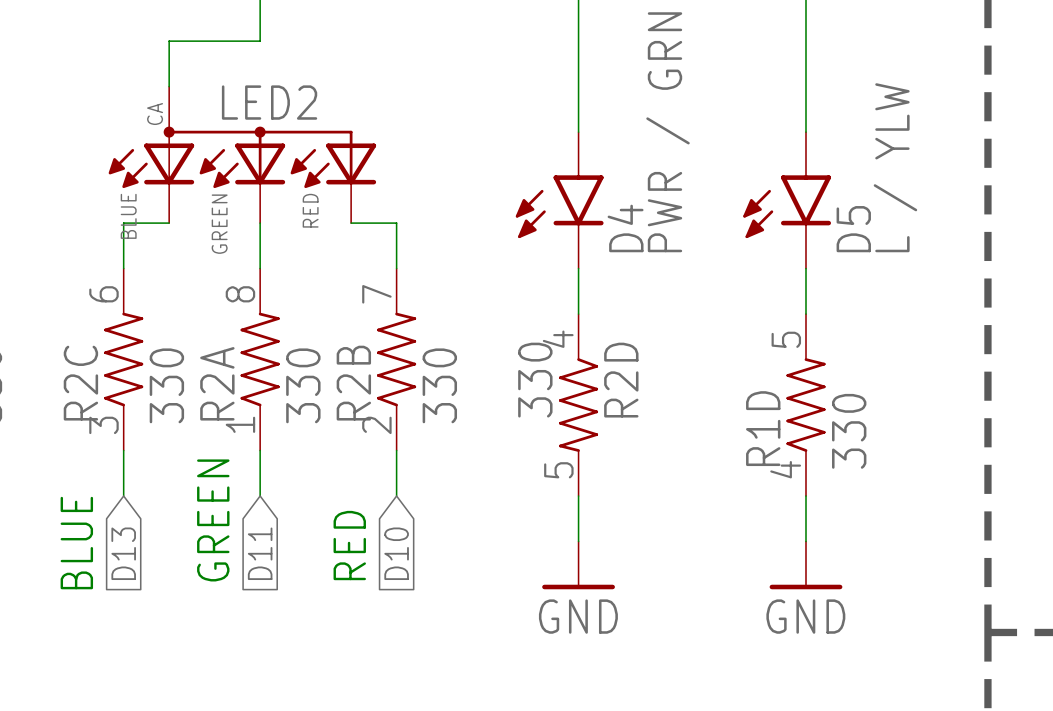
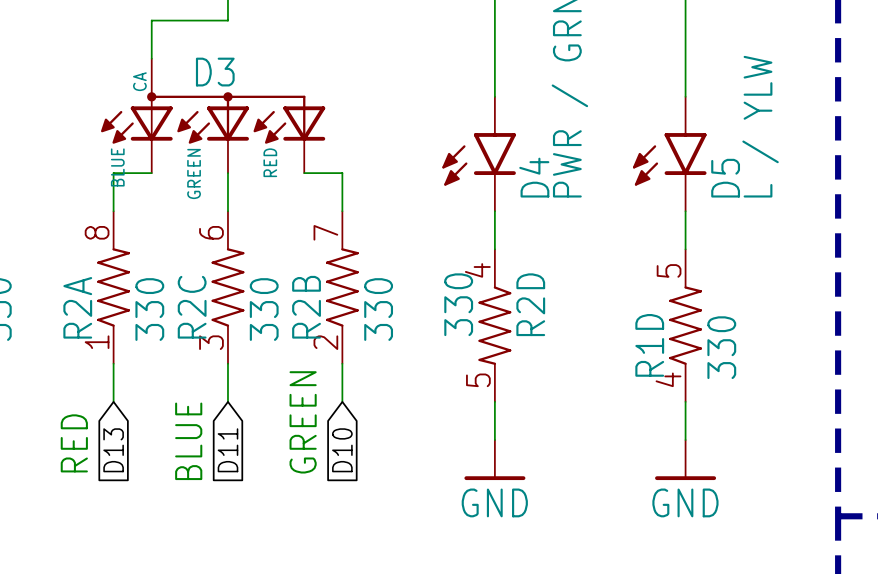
LED2 name: LED2 (269, 102) -> D3 (215, 72)
R2C position: (123, 359) -> (227, 287)
R2A position: (260, 359) -> (113, 287)
text: GREEN (213, 520) -> BLUE (188, 441)
text: BLUE (76, 543) -> RED (74, 443)
text: RED (349, 545) -> GREEN (303, 422)

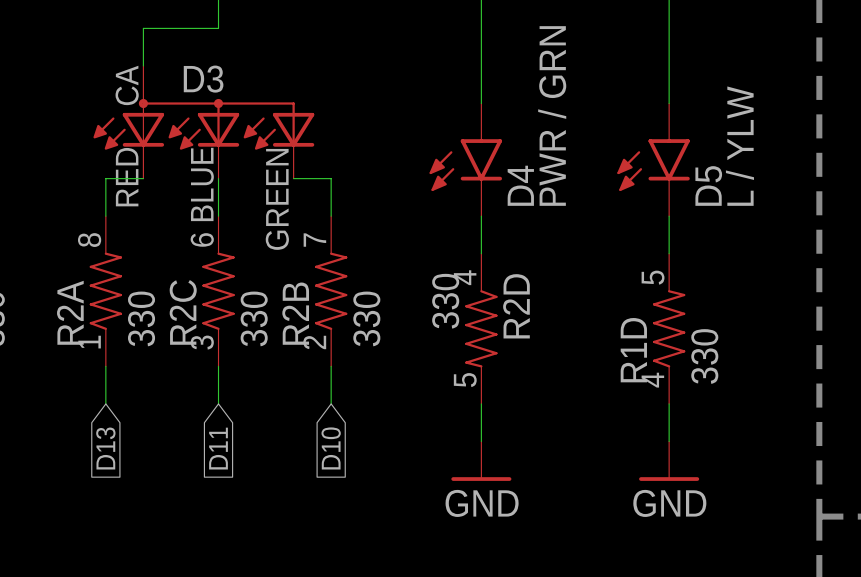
D3 pin number: none -> CA (127, 85)
D3 text: CA (139, 81) -> none
D3 text: RED (270, 162) -> none
D3 text: BLUE (117, 167) -> none
D3 pin number: none -> RED (127, 177)
D3 text: GREEN (194, 173) -> none
D3 pin number: none -> BLUE (202, 184)
D3 pin number: none -> GREEN (277, 199)
text: GREEN (303, 422) -> none
text: BLUE (188, 441) -> none
text: RED (74, 443) -> none

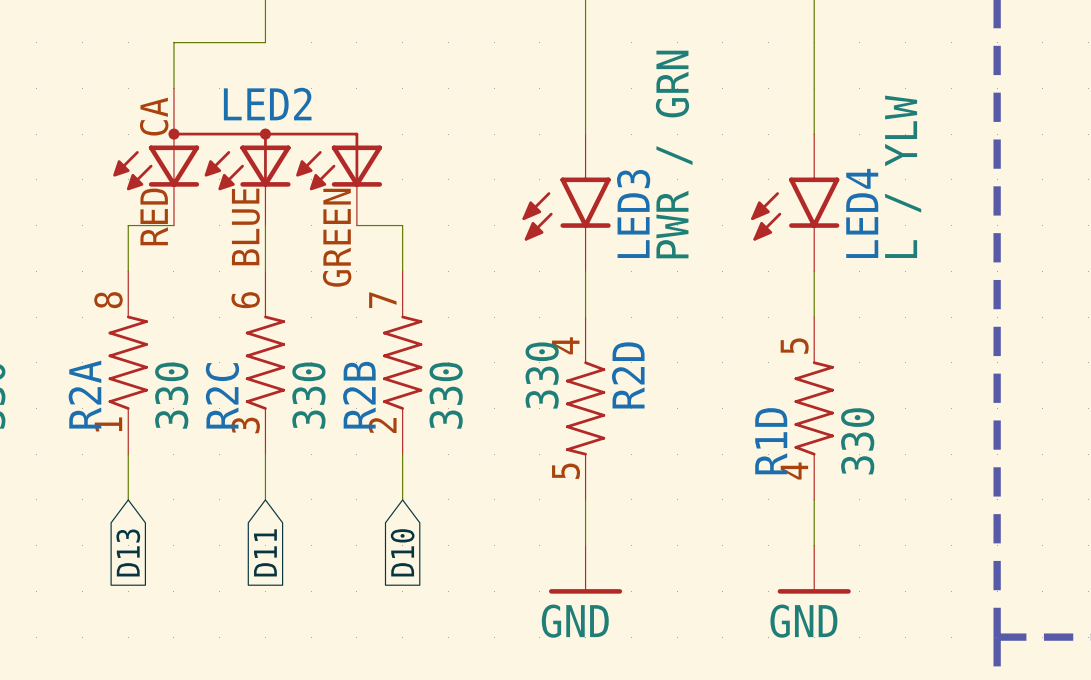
D3 name: D3 (203, 79) -> LED2 (267, 104)
D4 name: D4 (520, 185) -> LED3 (633, 213)
D5 name: D5 (708, 185) -> LED4 (862, 213)

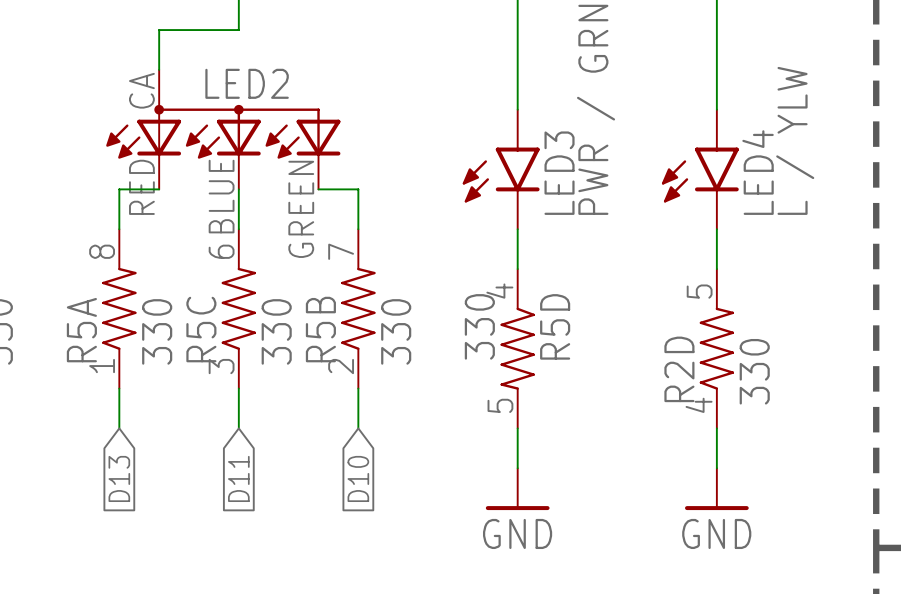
R2D name: R2D (628, 375) -> R5D (555, 326)
R2A name: R2A (84, 394) -> R5A (81, 330)
R2C name: R2C (222, 395) -> R5C (201, 329)
R2B name: R2B (359, 395) -> R5B (320, 329)
R1D name: R1D (771, 441) -> R2D (679, 369)

